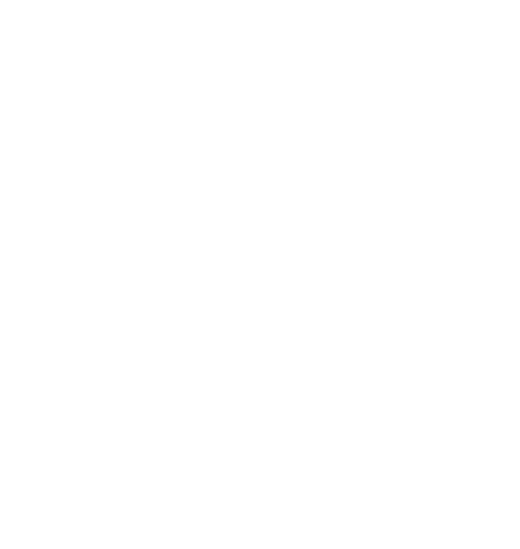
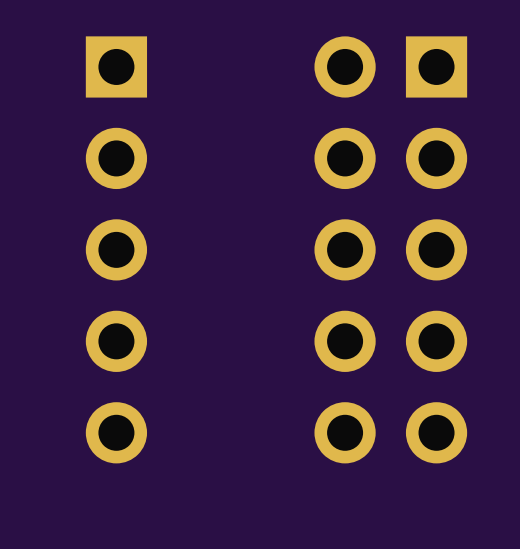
part: none -> (116, 249)
part: none -> (390, 249)

